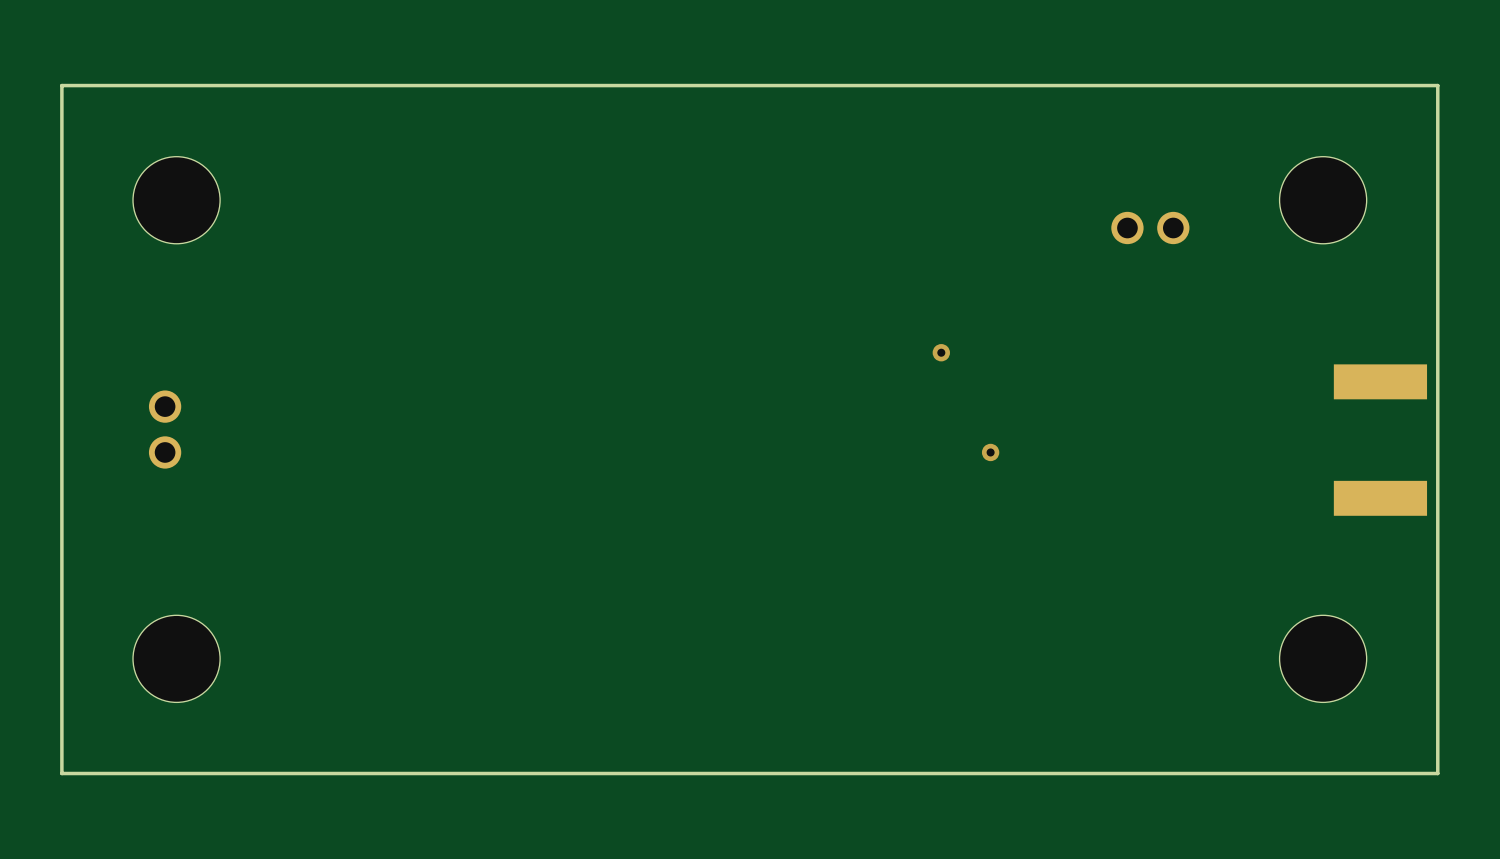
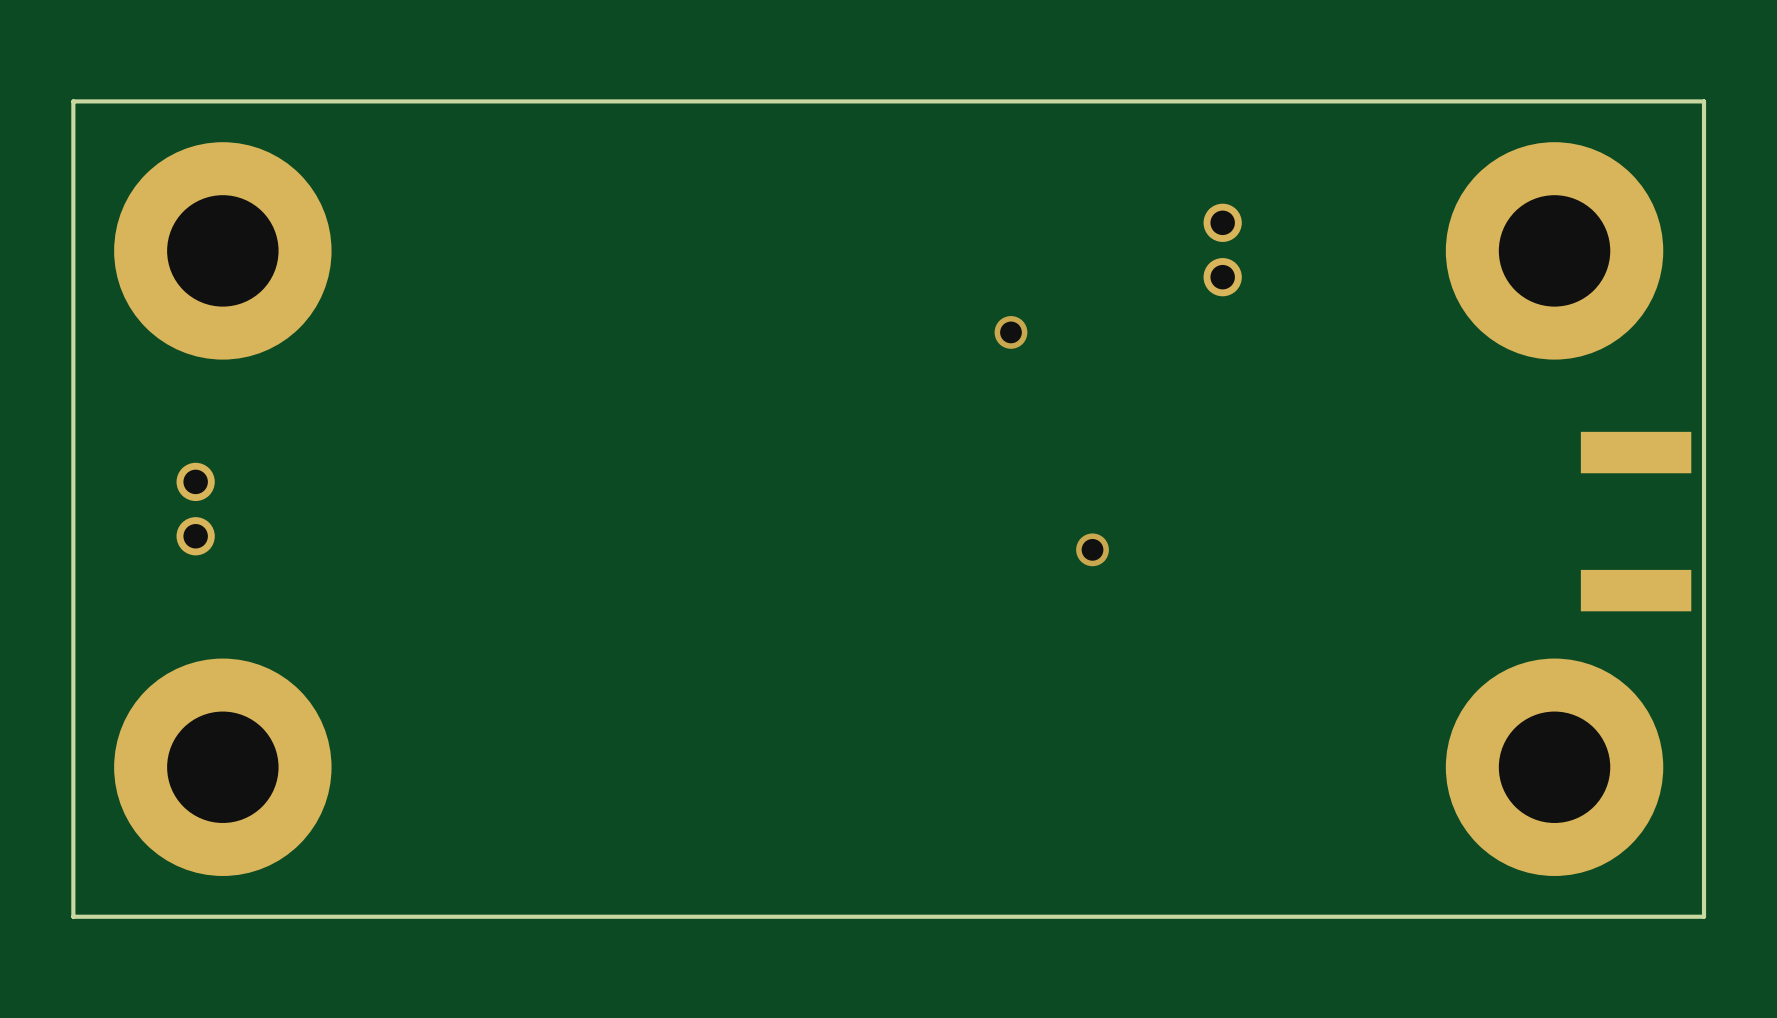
hole: (176, 200) -> none
hole: (1323, 200) -> none
part: none -> (222, 250)
part: none -> (1554, 250)
part rotation: 0° (1150, 227) -> 90° clockwise (1222, 249)
part position: (1150, 227) -> (1222, 249)
via: none -> (1010, 332)
via: (941, 352) -> none
via: (990, 452) -> none
via: none -> (1092, 549)
part: none -> (222, 767)
part: none -> (1554, 767)
hole: (176, 658) -> none
hole: (1323, 658) -> none

